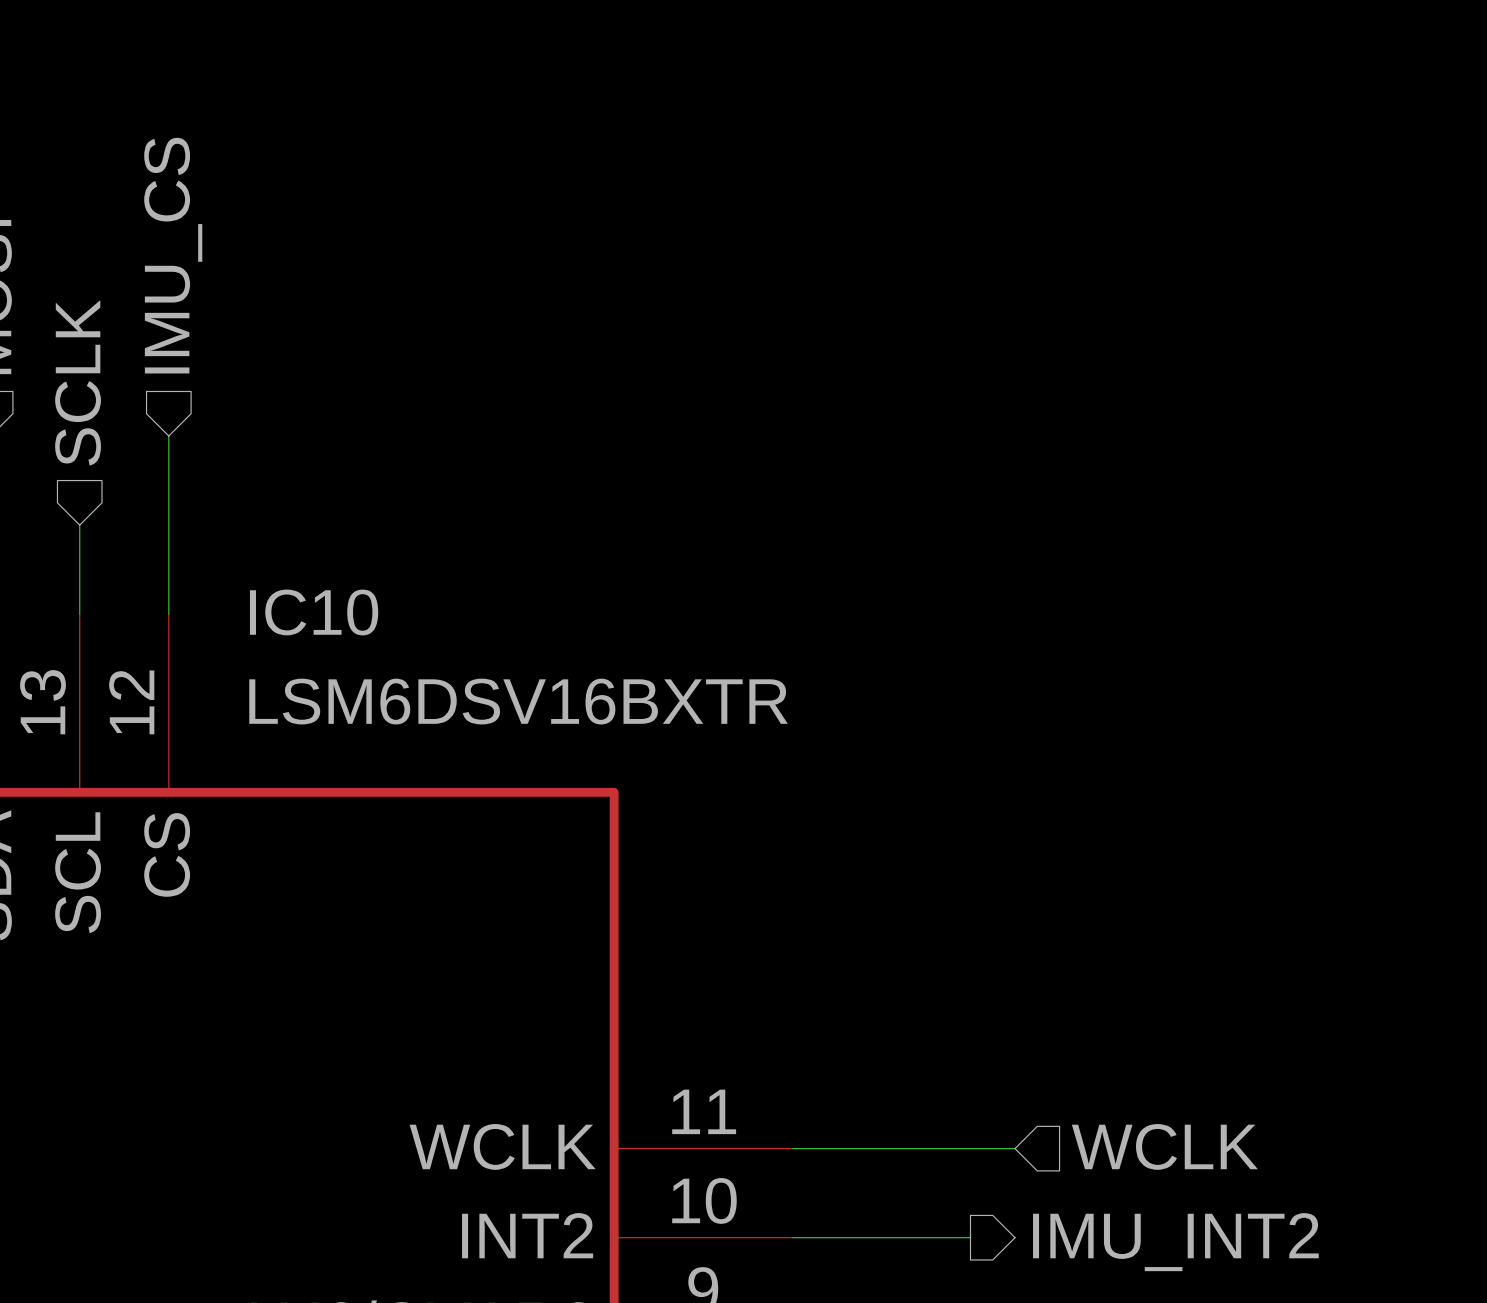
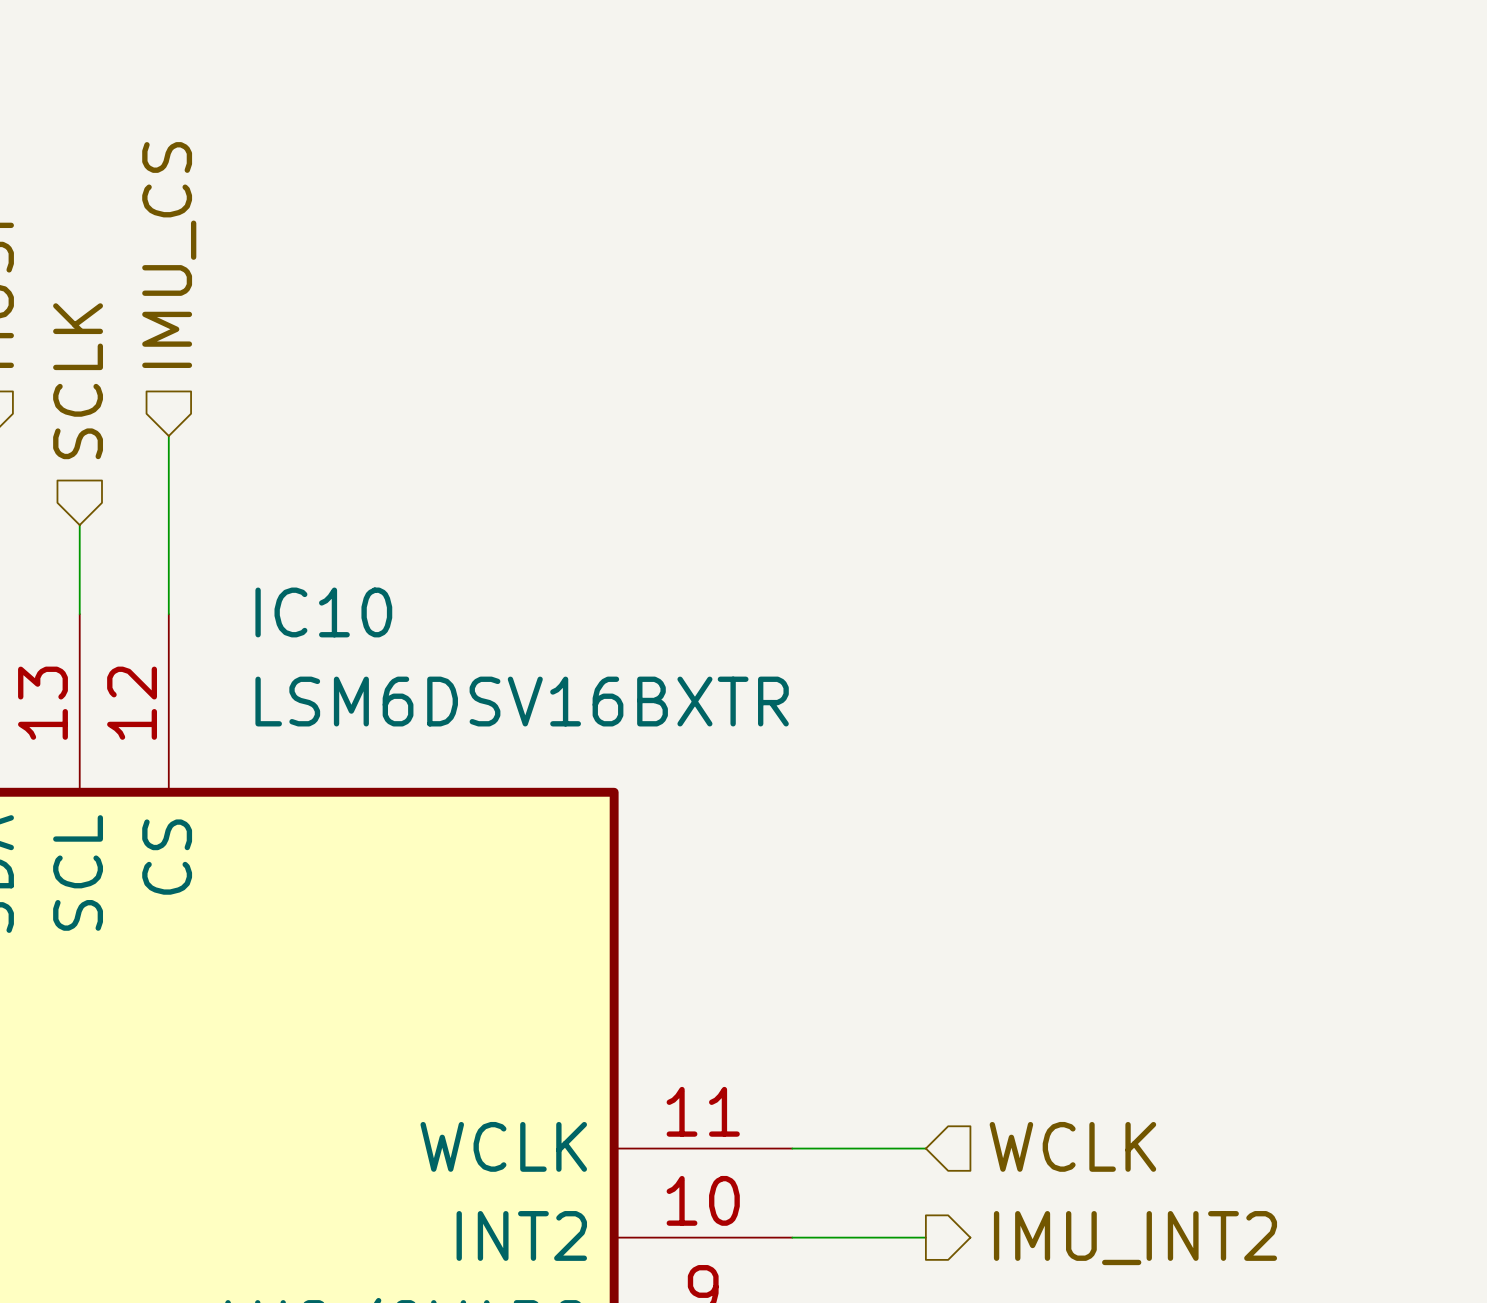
hierarchical label position: WCLK (1164, 1146) -> WCLK (1072, 1146)
wire: (925, 1148) (1015, 1148) -> none
wire: (925, 1237) (970, 1237) -> none
hierarchical label position: IMU_INT2 (1175, 1242) -> IMU_INT2 (1135, 1238)

